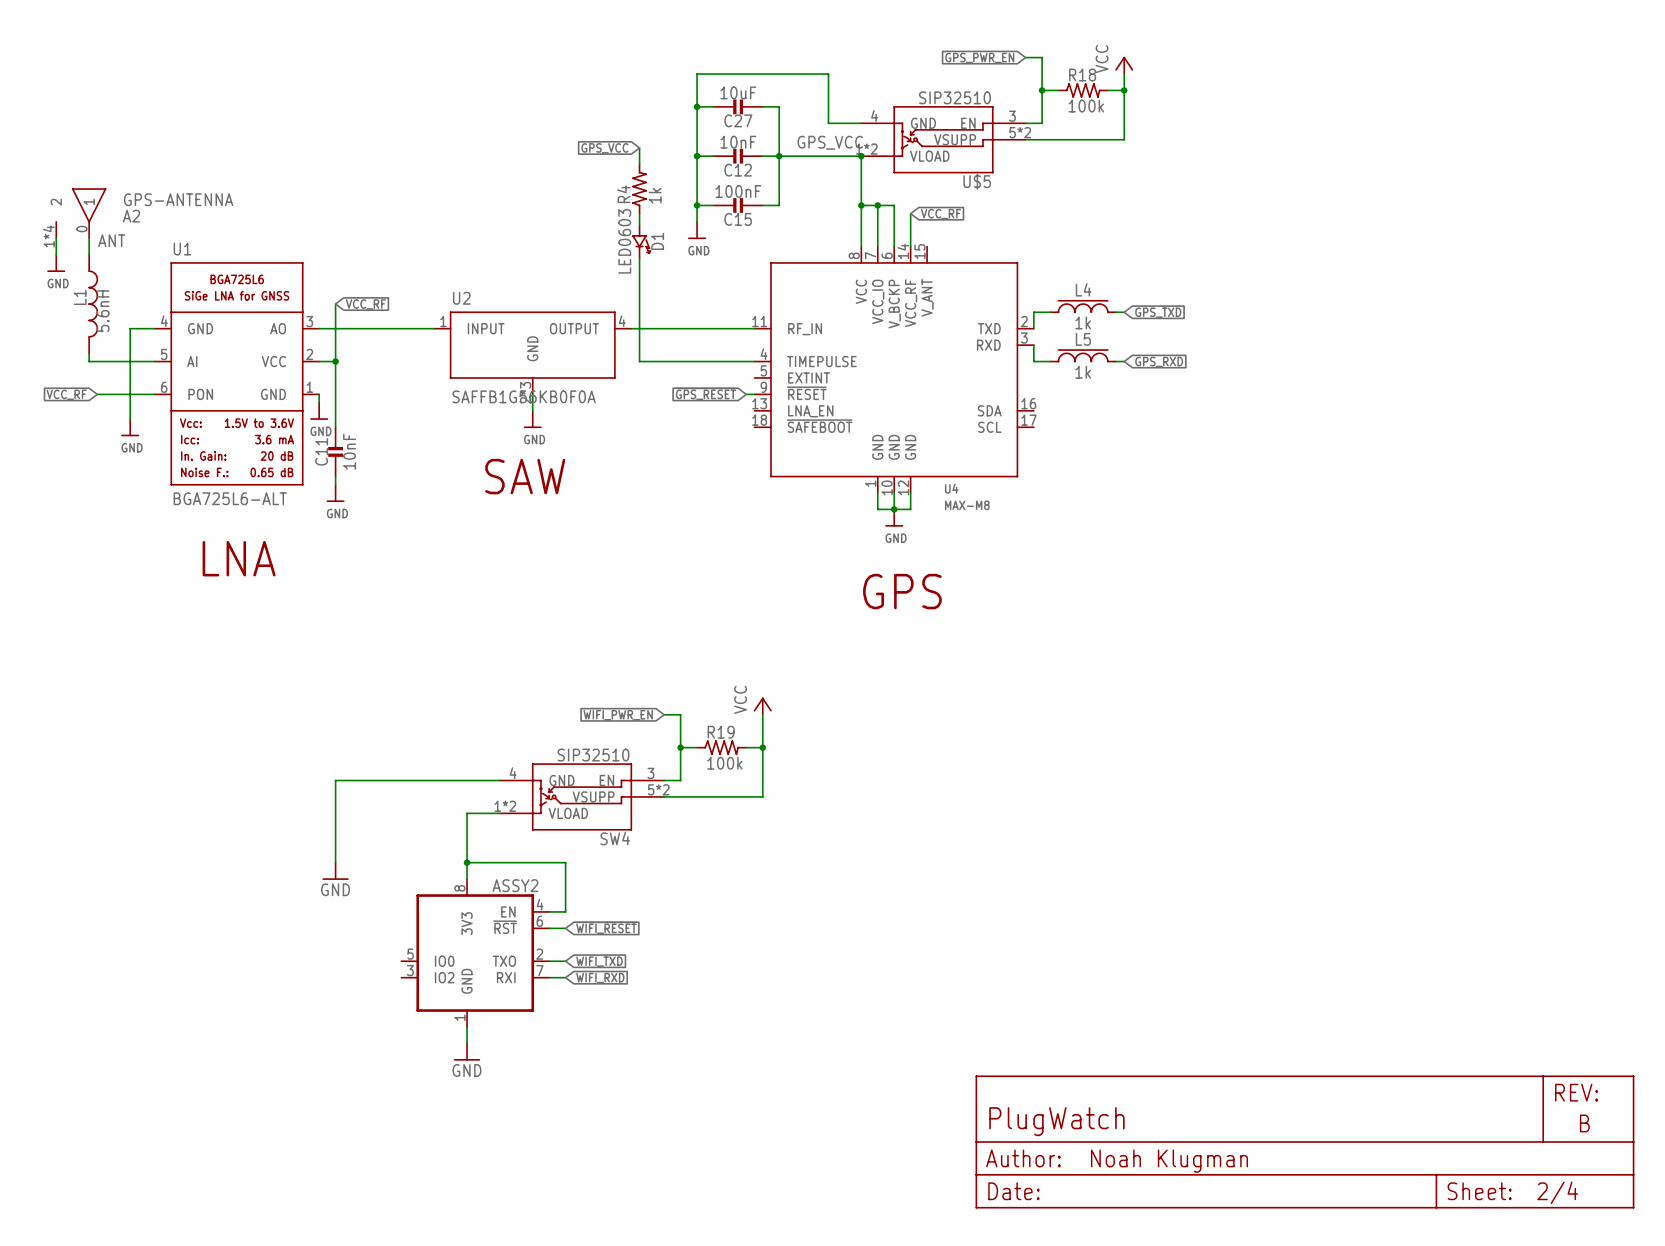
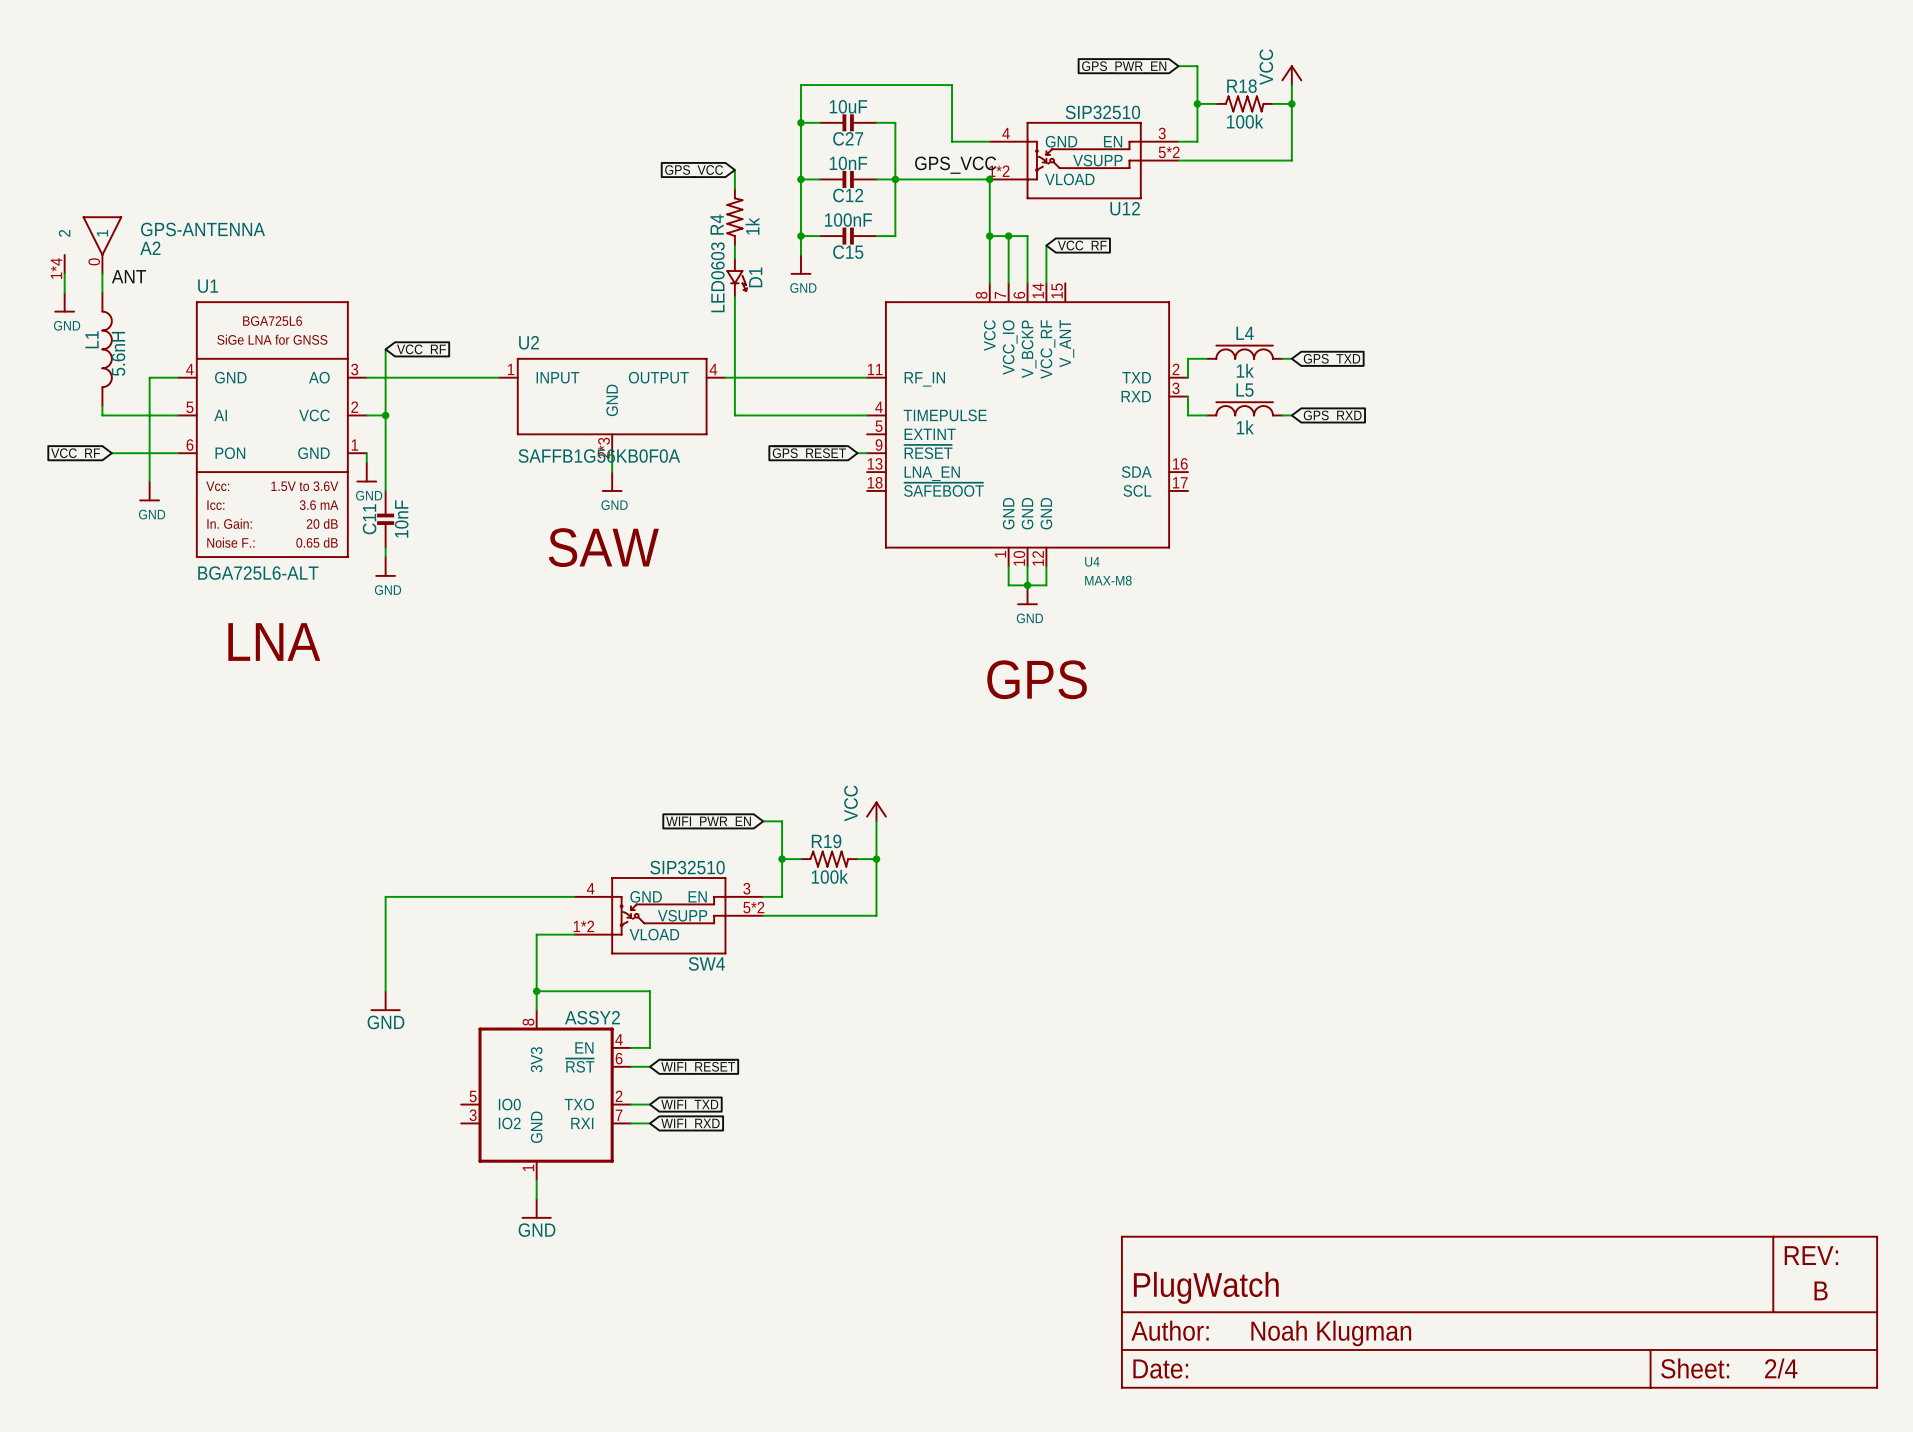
U$5 name: U$5 (977, 181) -> U12 (1125, 208)

